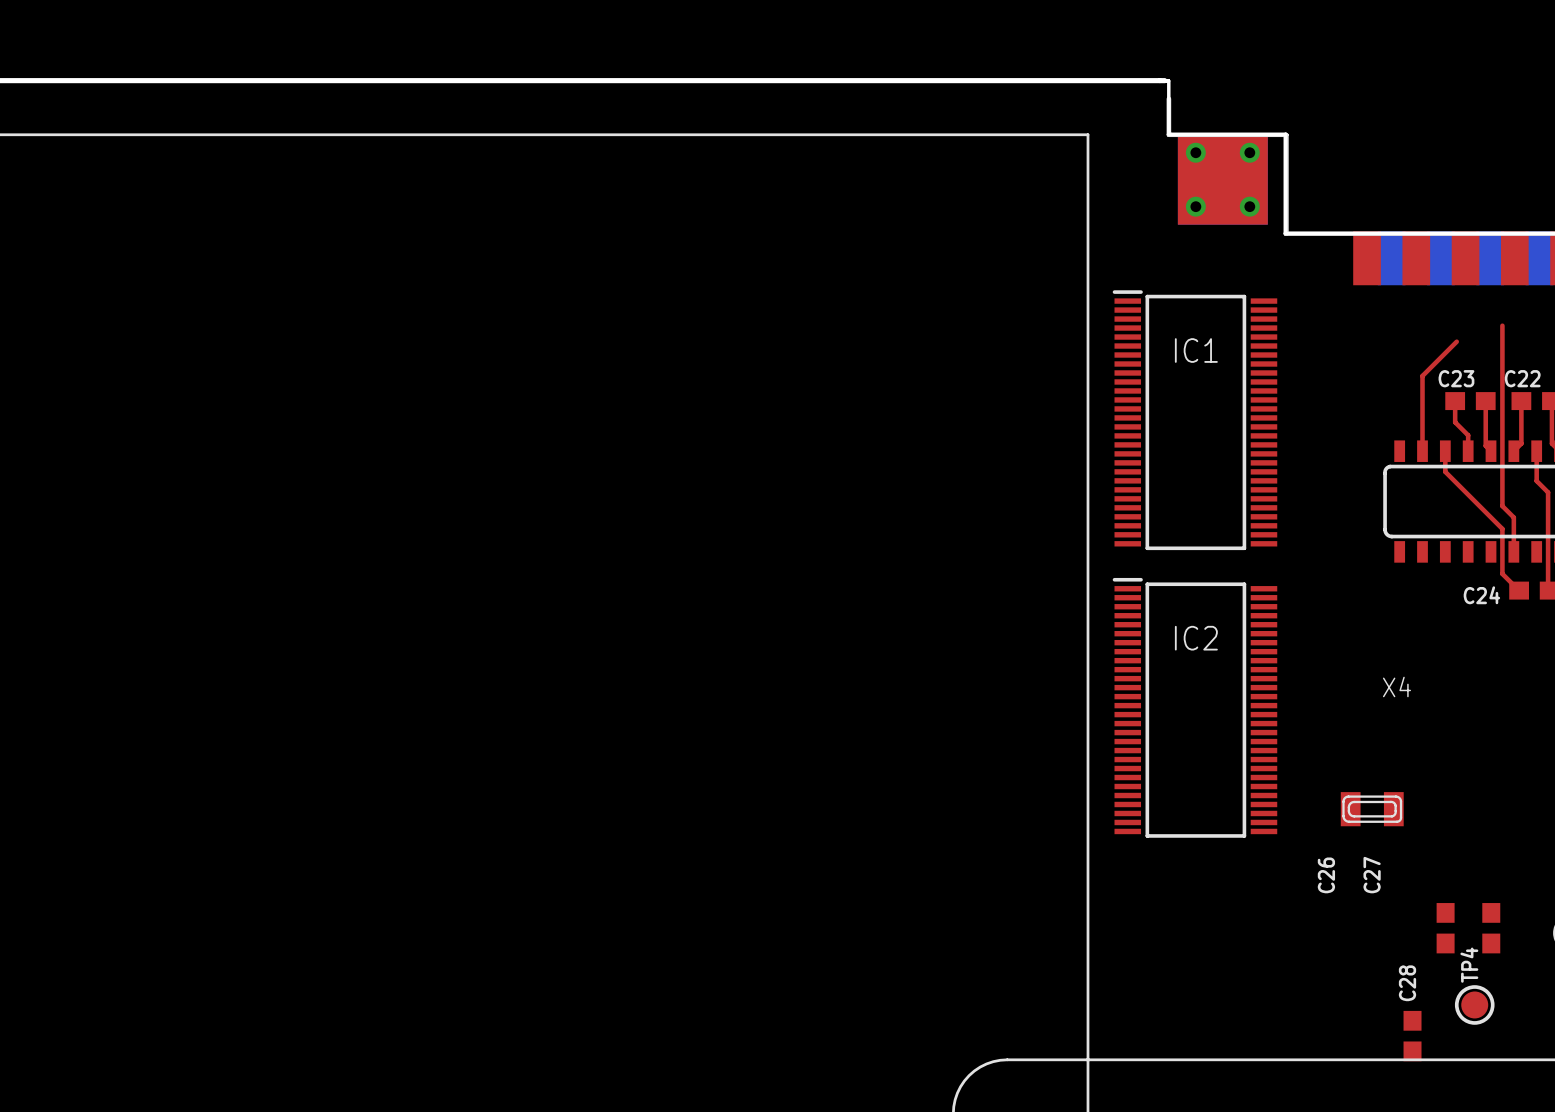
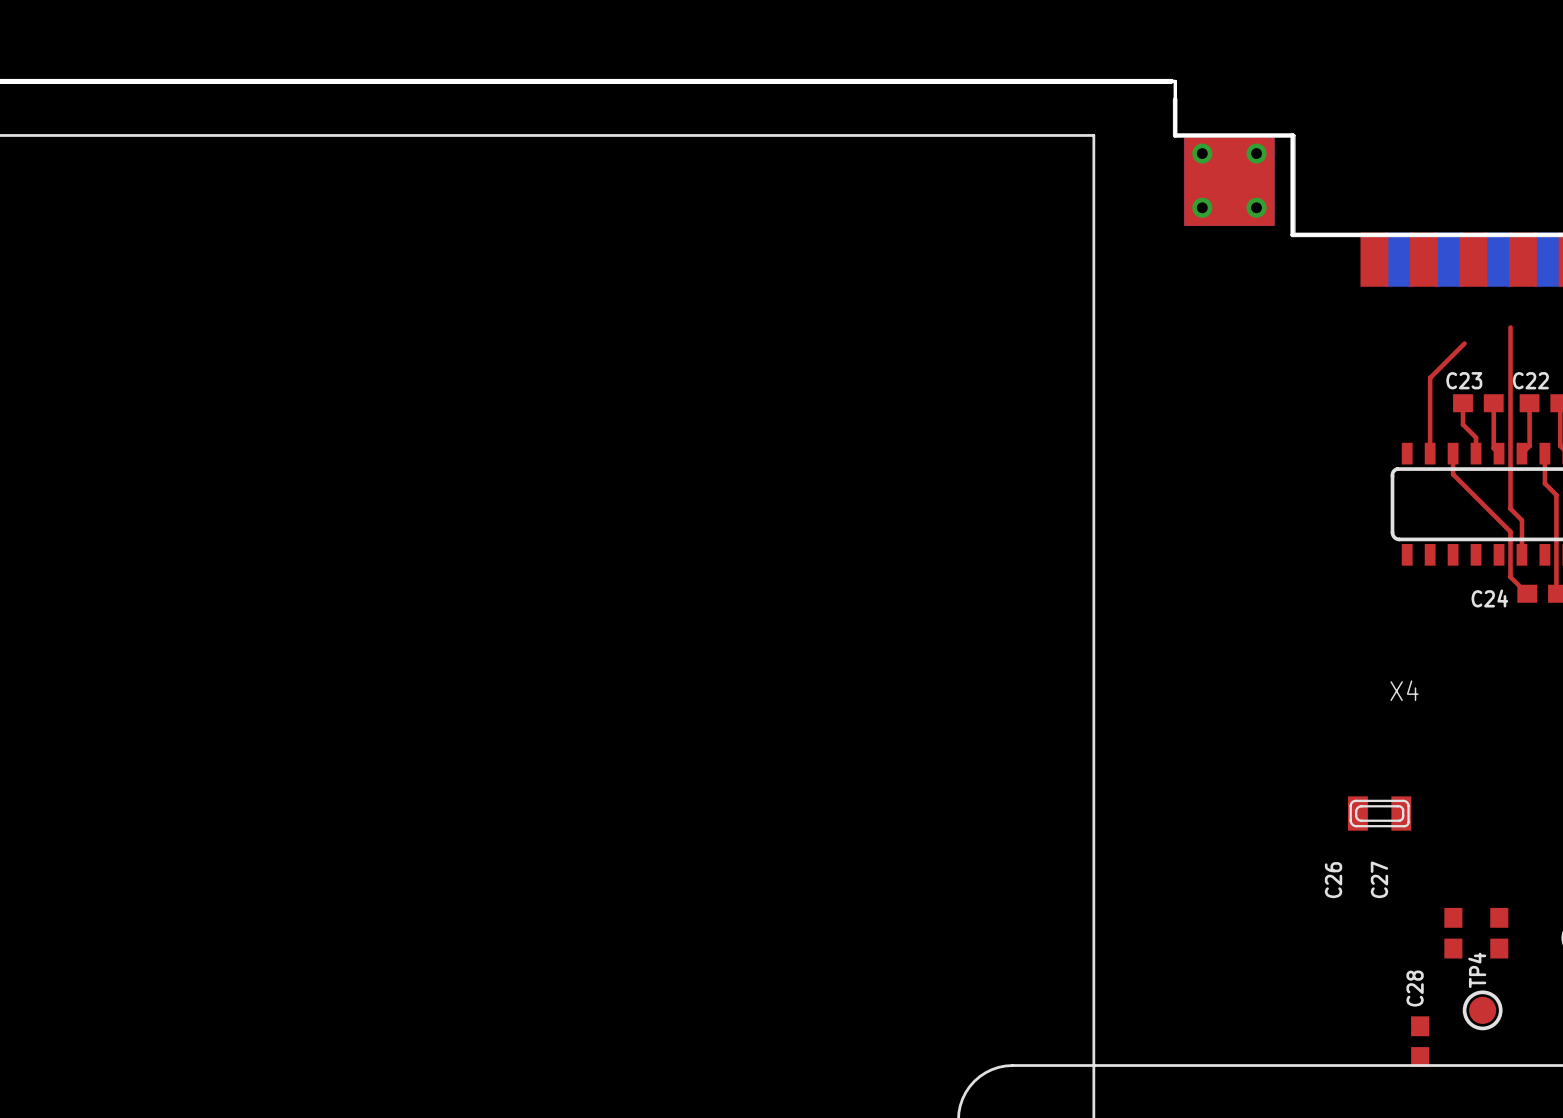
IC1: (1194, 420) -> none
IC2: (1194, 707) -> none

